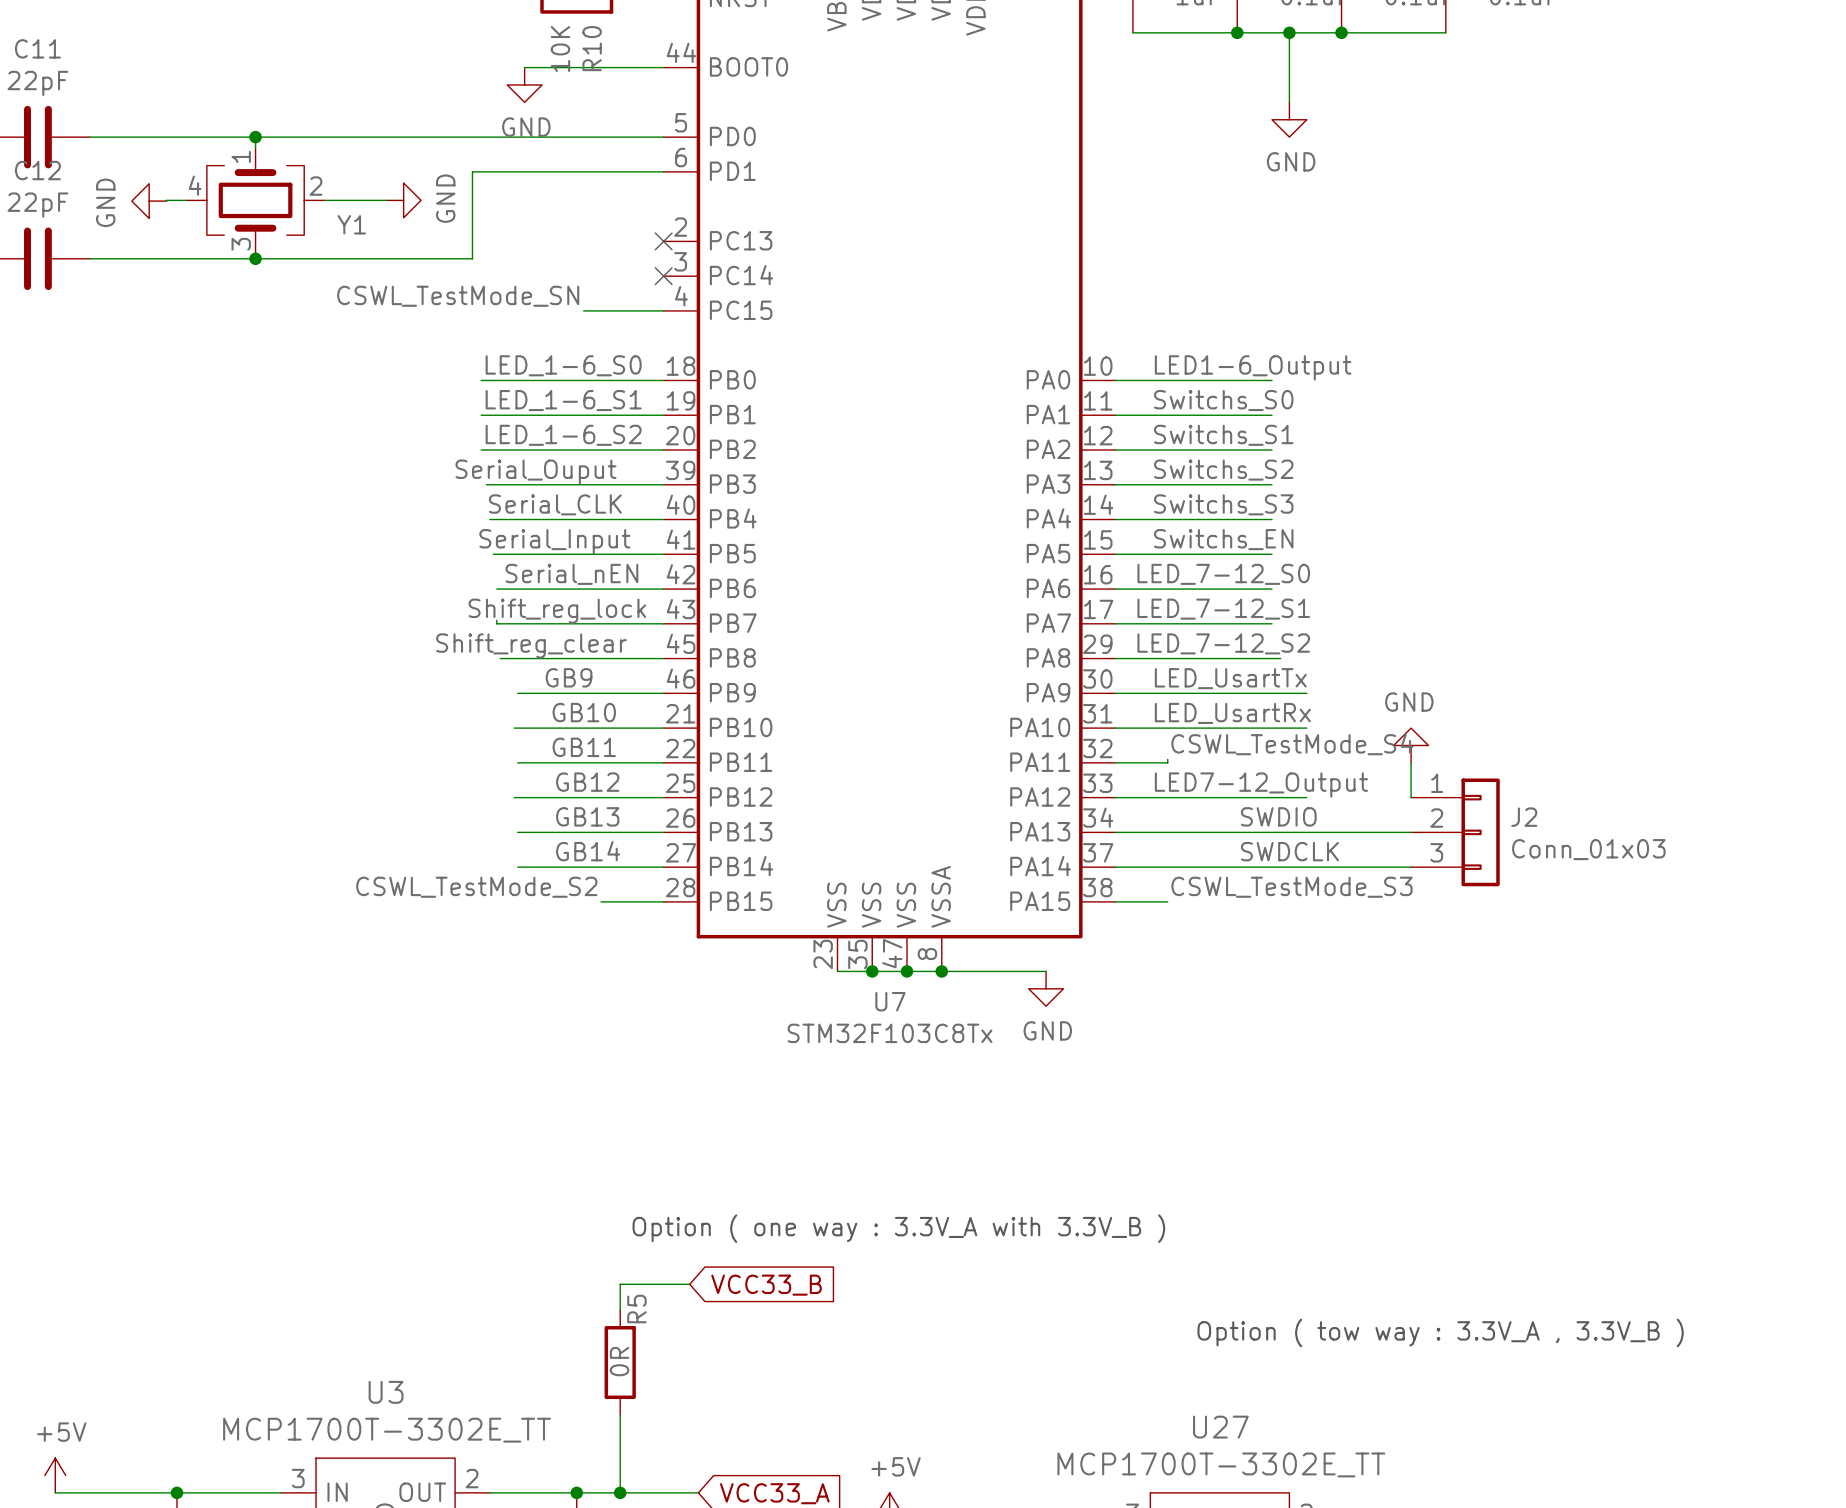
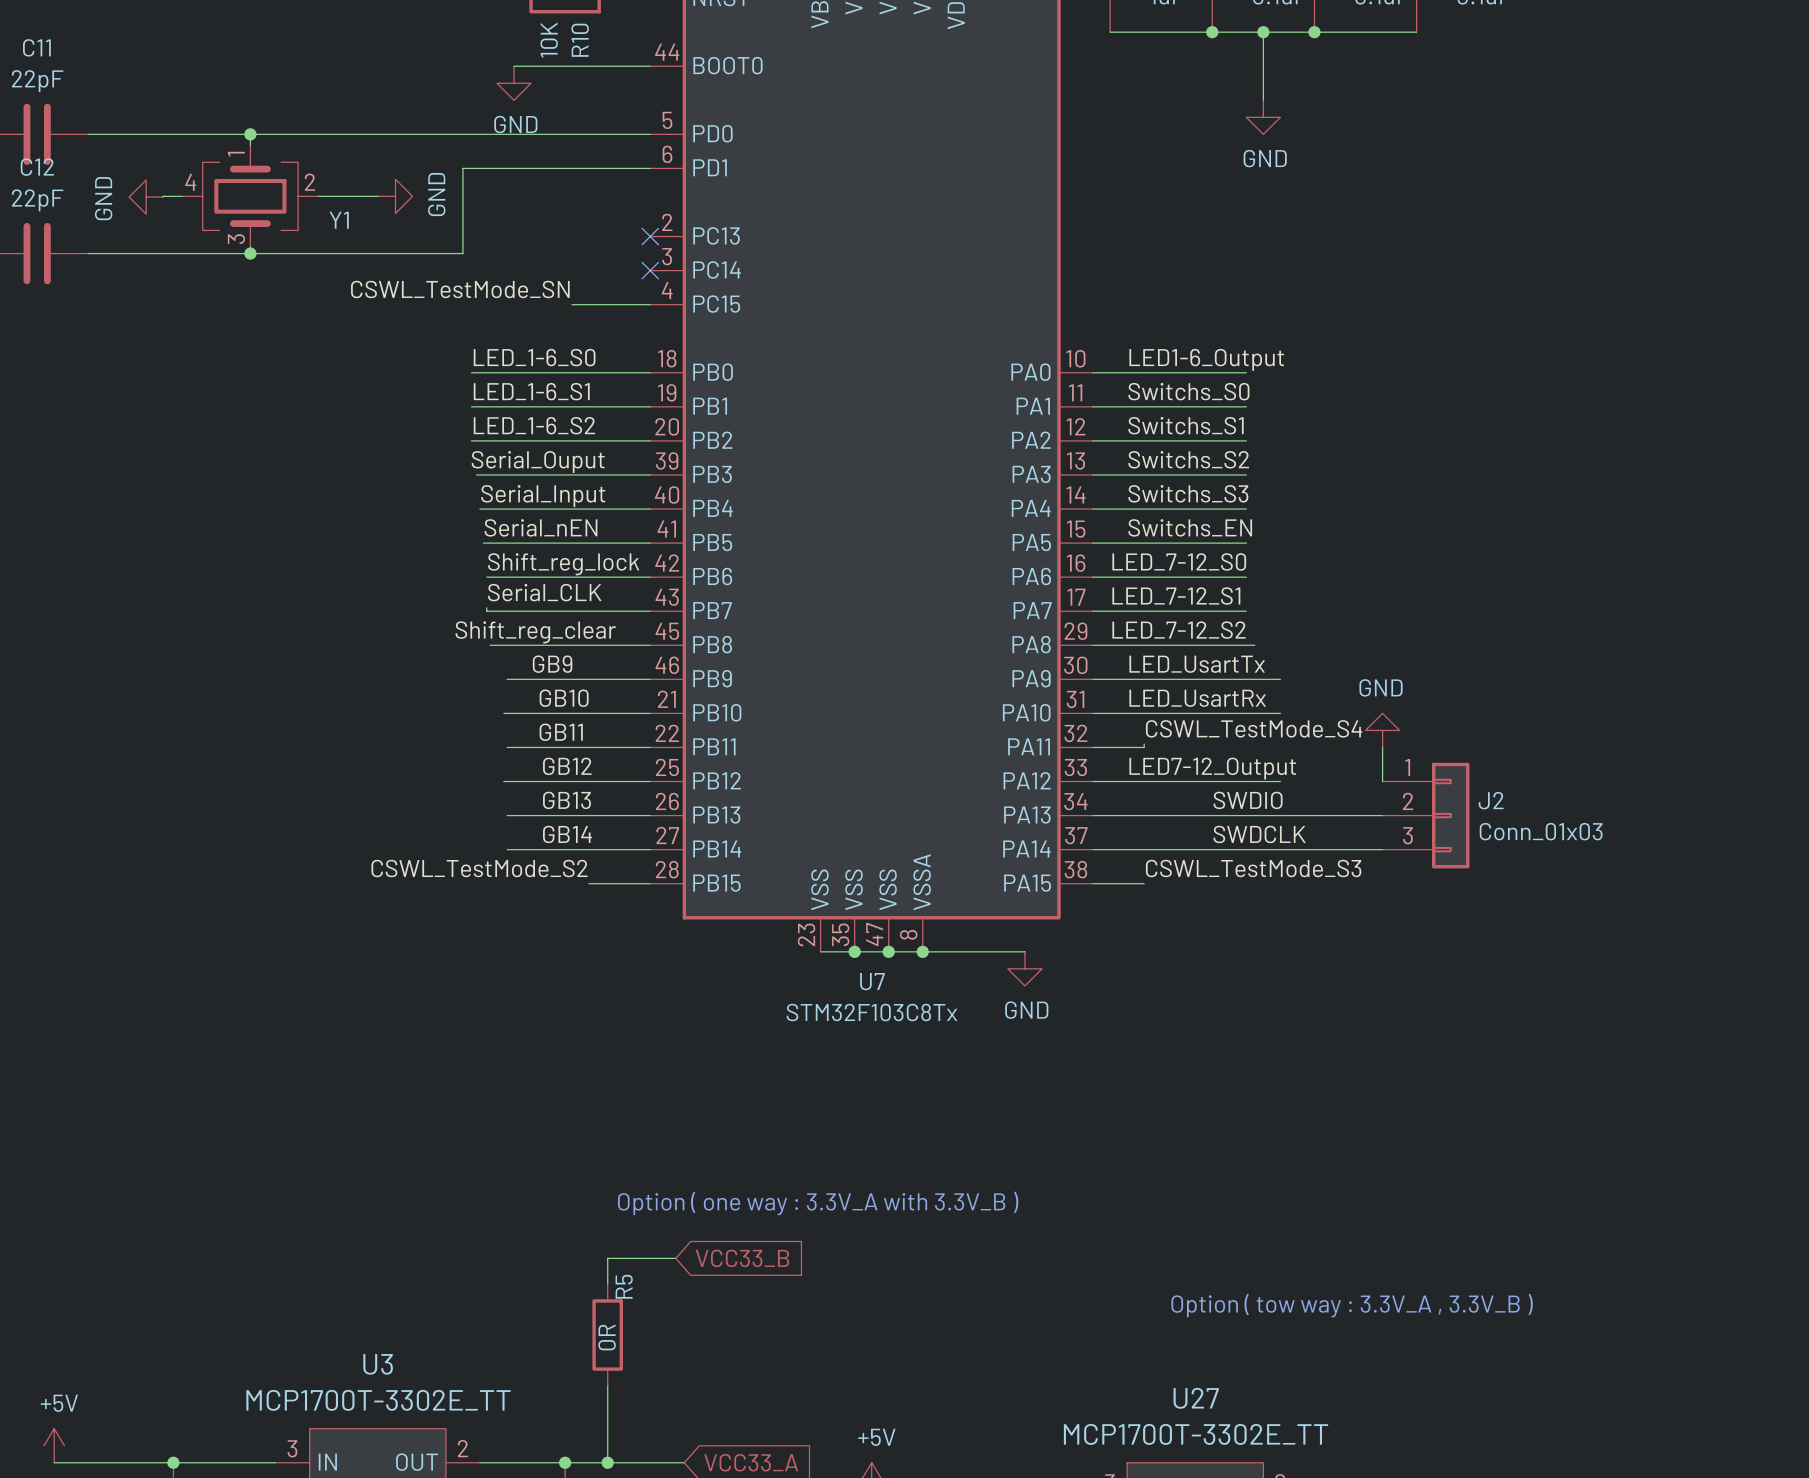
label position: Serial_CLK (555, 504) -> Serial_CLK (544, 592)
label position: Serial_Input (554, 541) -> Serial_Input (543, 496)
label position: Serial_nEN (571, 574) -> Serial_nEN (541, 527)
label position: Shift_reg_lock (557, 611) -> Shift_reg_lock (563, 564)

